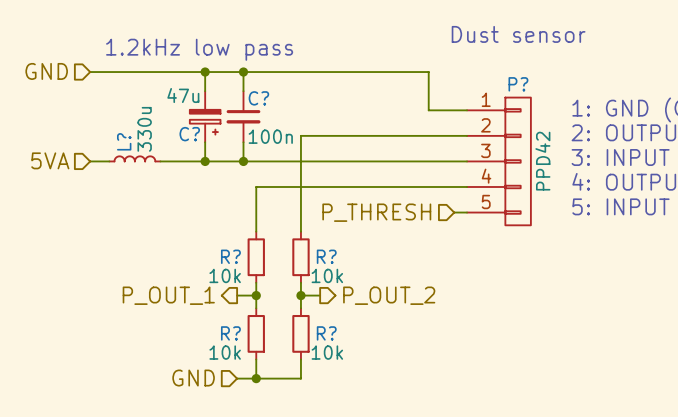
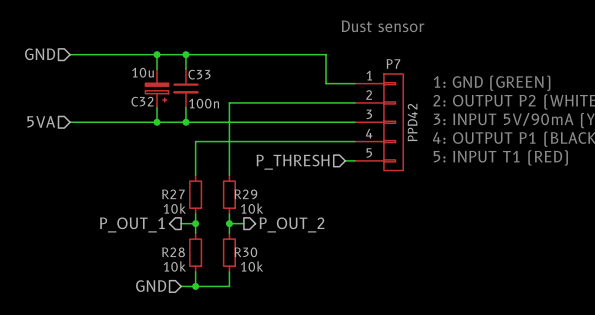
text: 1.2kHz low pass (199, 49) -> none
P? name: P? (518, 84) -> P7 (393, 63)
C? value: 47u (183, 95) -> 10u (142, 72)
C? name: C? (258, 98) -> C33 (199, 74)
C? name: C? (189, 134) -> C32 (142, 101)
L?: 330u (134, 158) -> none
wire: none -> (84, 122) (123, 122)
R? name: R? (230, 256) -> R27 (173, 194)
R? name: R? (326, 256) -> R29 (245, 194)
R? name: R? (230, 333) -> R28 (173, 252)
R? name: R? (326, 333) -> R30 (245, 252)

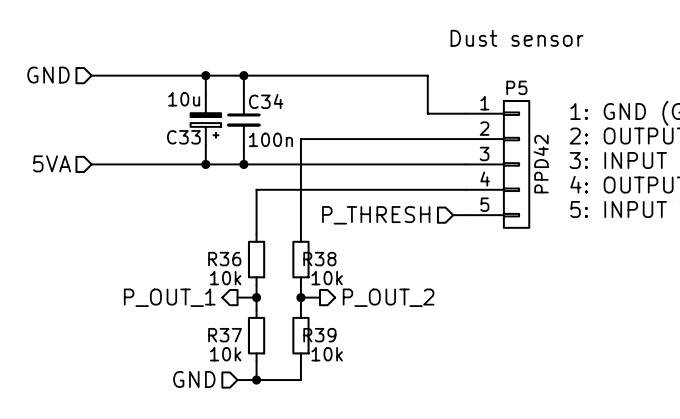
P7 name: P7 (393, 63) -> P5 (516, 87)
C33 name: C33 (199, 74) -> C34 (266, 101)
C32 name: C32 (142, 101) -> C33 (183, 137)
R27 name: R27 (173, 194) -> R36 (224, 259)
R29 name: R29 (245, 194) -> R38 (319, 259)
R28 name: R28 (173, 252) -> R37 (225, 335)
R30 name: R30 (245, 252) -> R39 (319, 335)

